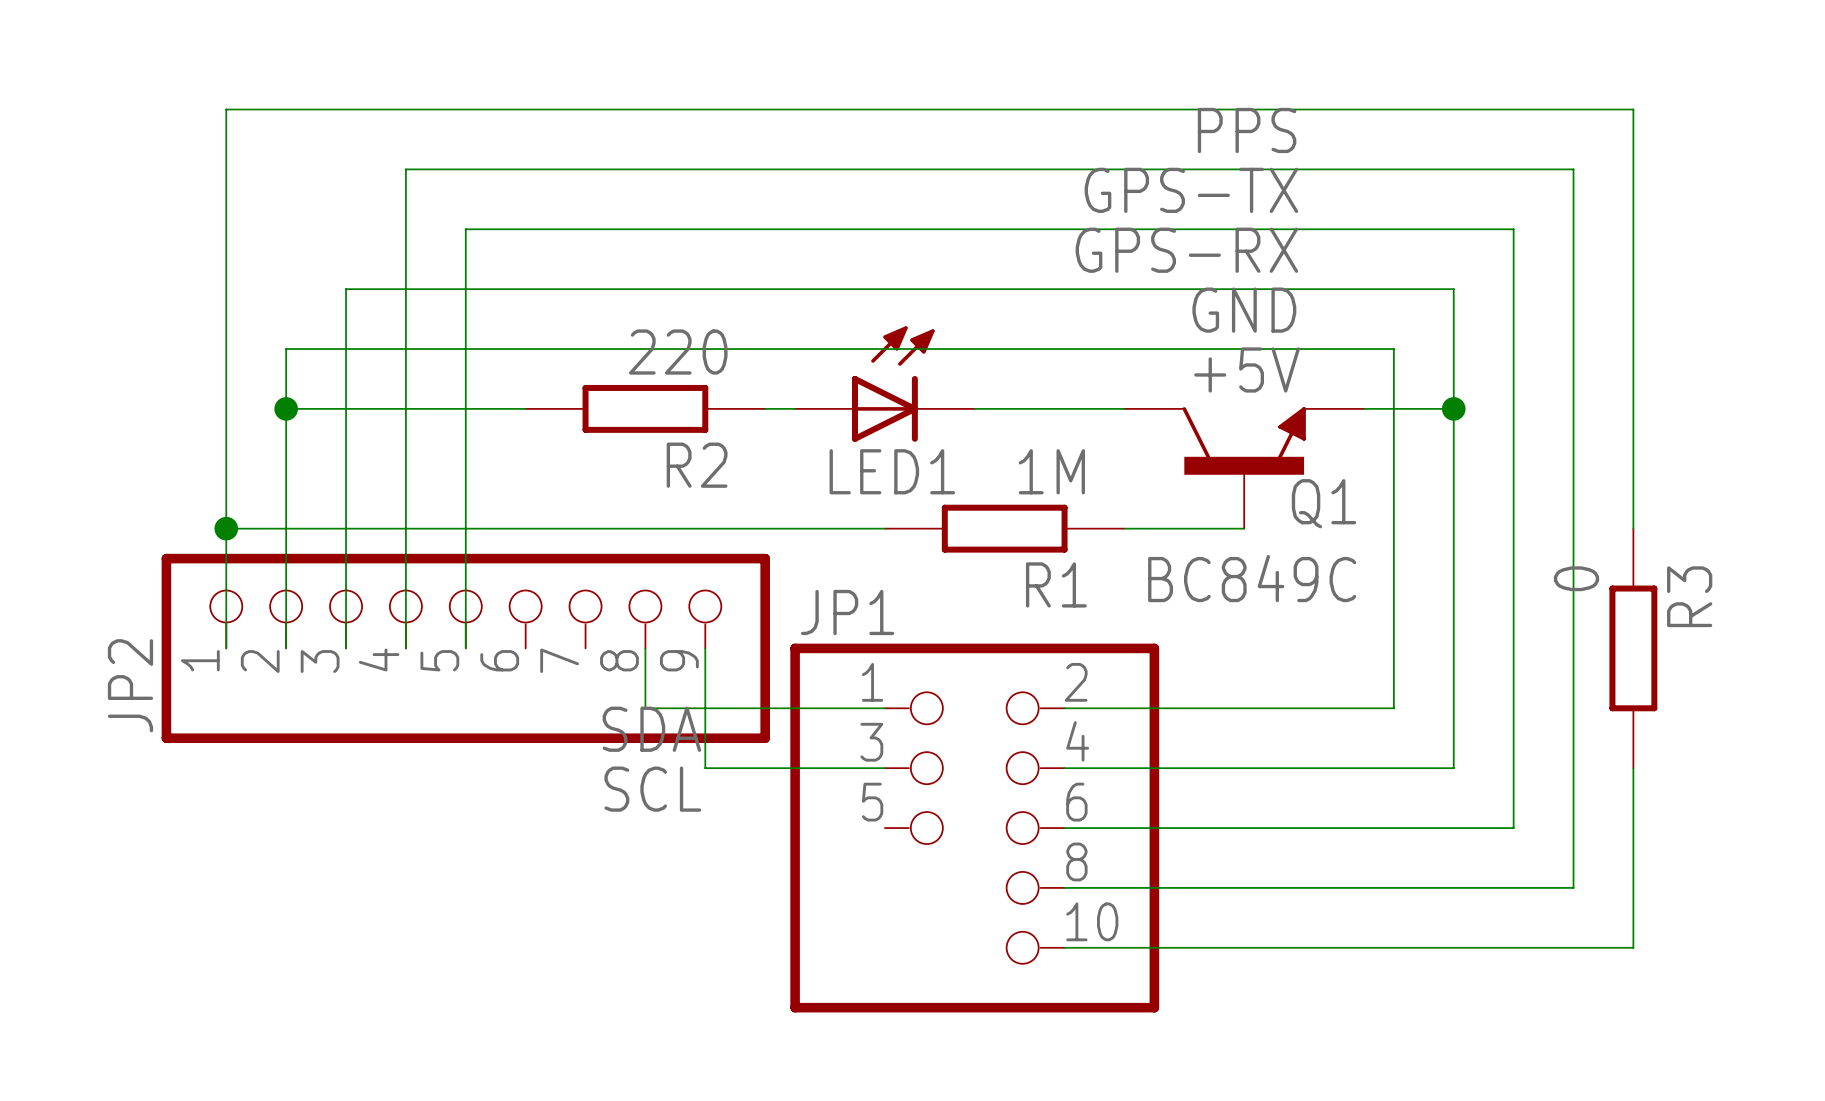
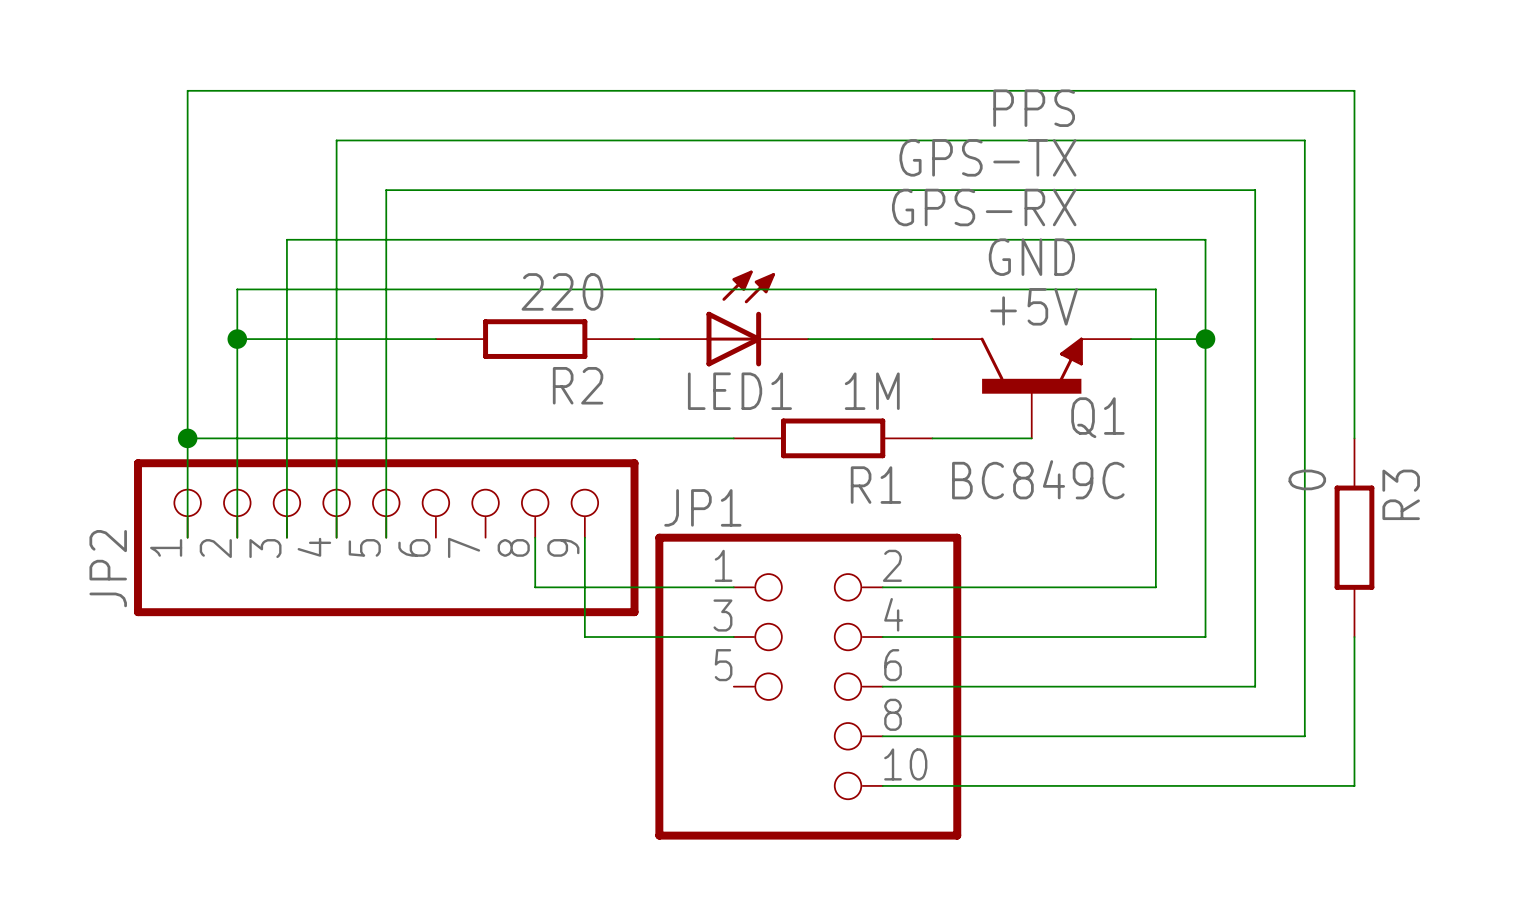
label: SDA (651, 729) -> none
label: SCL (652, 789) -> none

